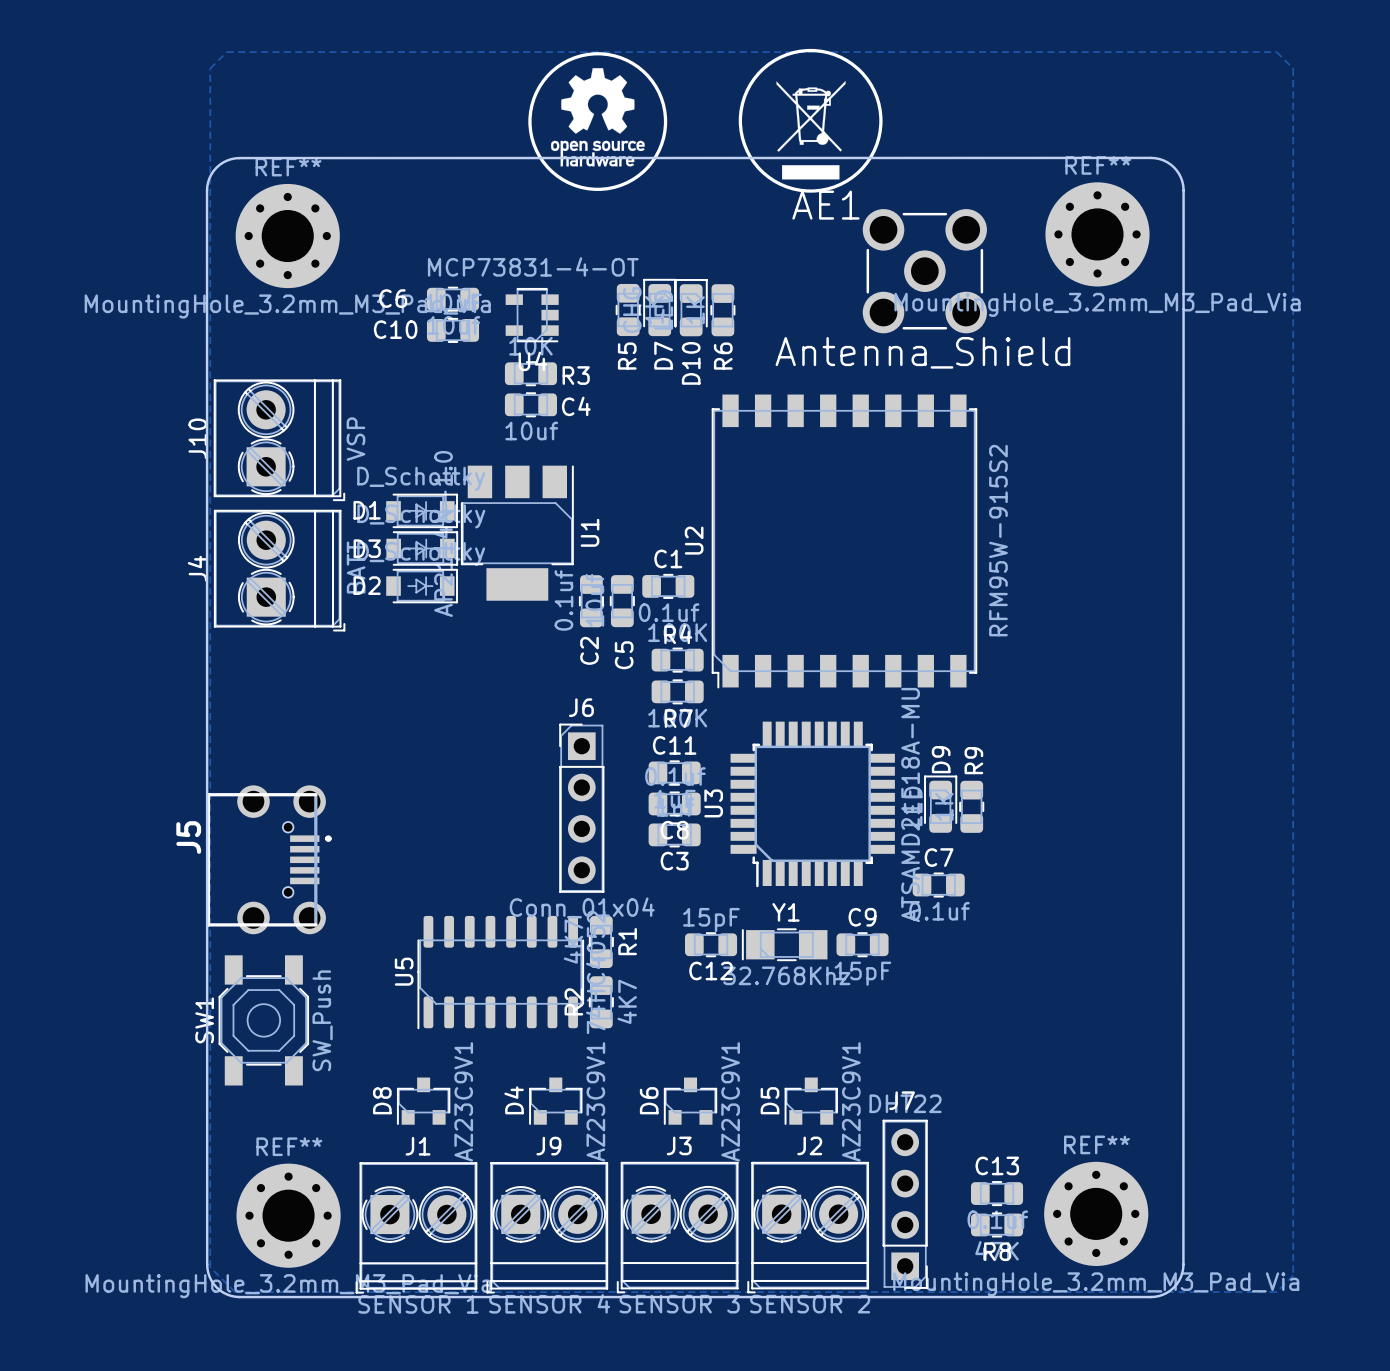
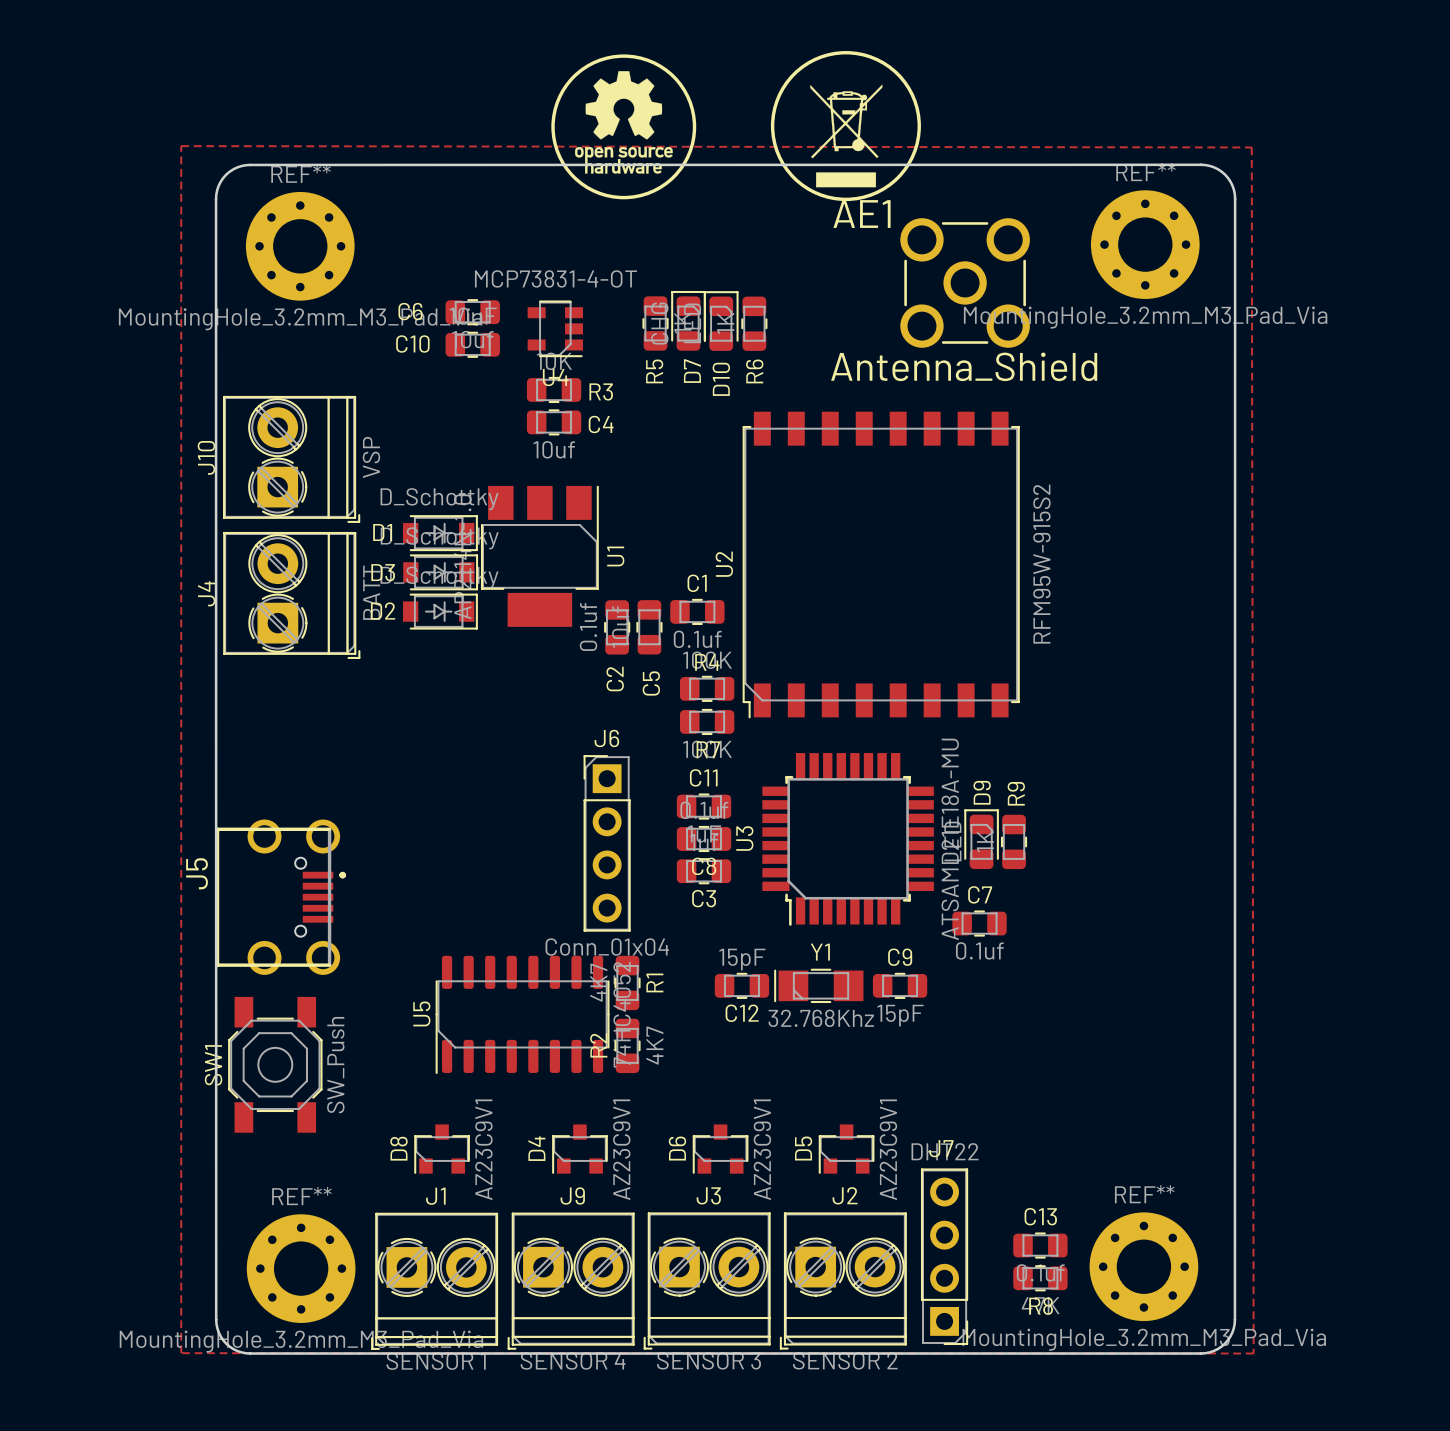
zone outline: (226, 52) (210, 68) (210, 1267) (235, 1292) (1276, 1292) (1293, 1275) (1293, 68) (1276, 52) (226, 52) -> (181, 146) (181, 1353) (1253, 1353) (1251, 147) (181, 146)

